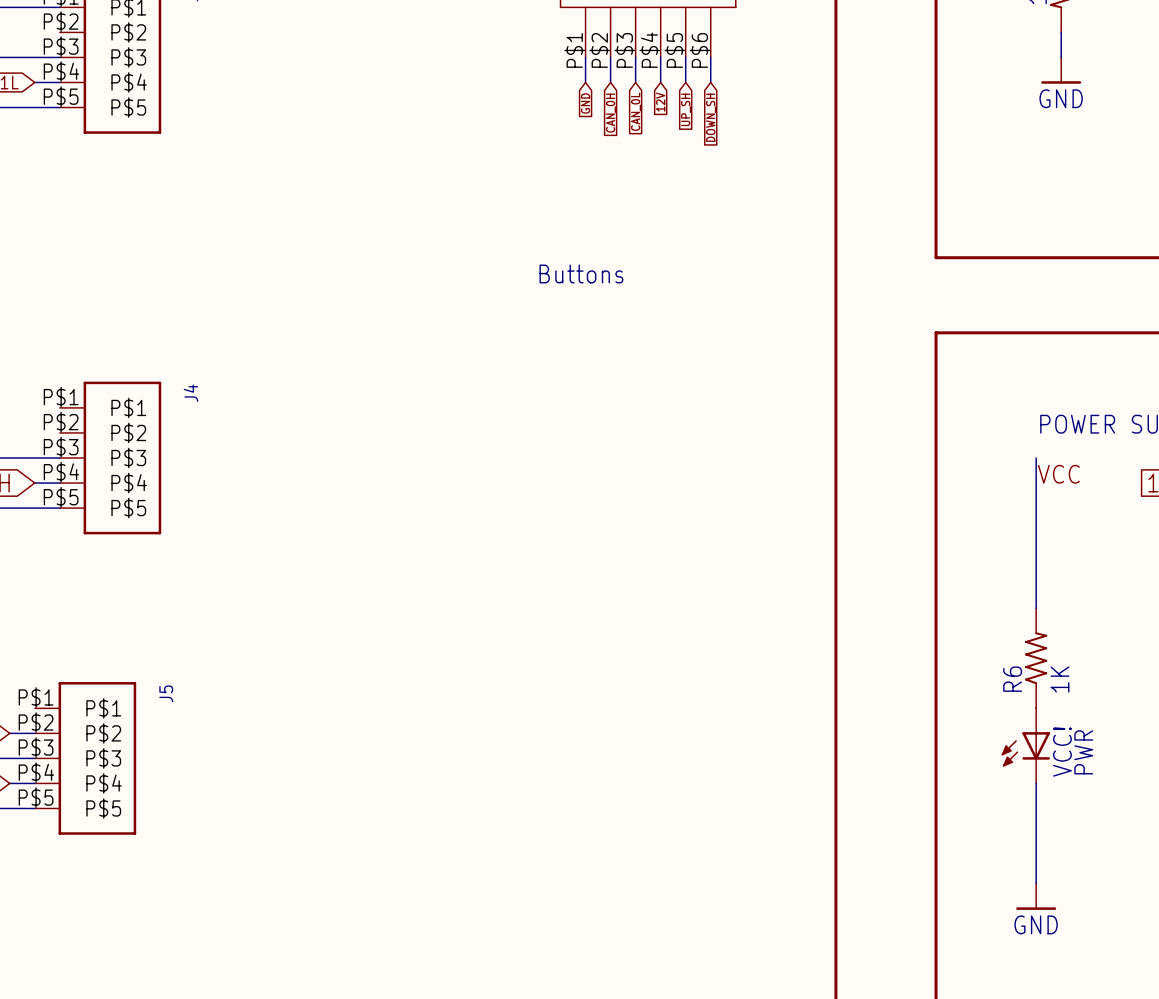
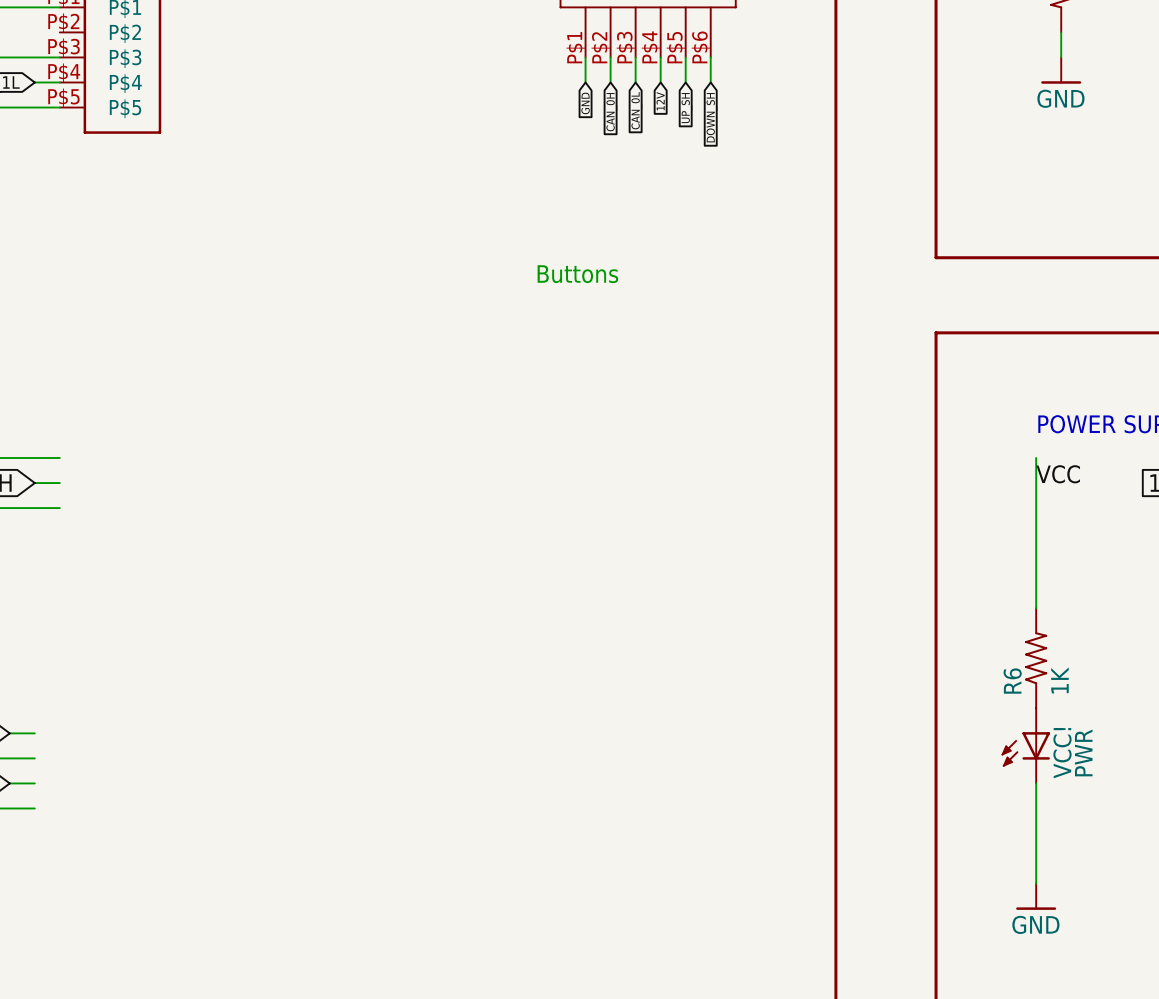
J4: (110, 458) -> none
J5: (85, 758) -> none

